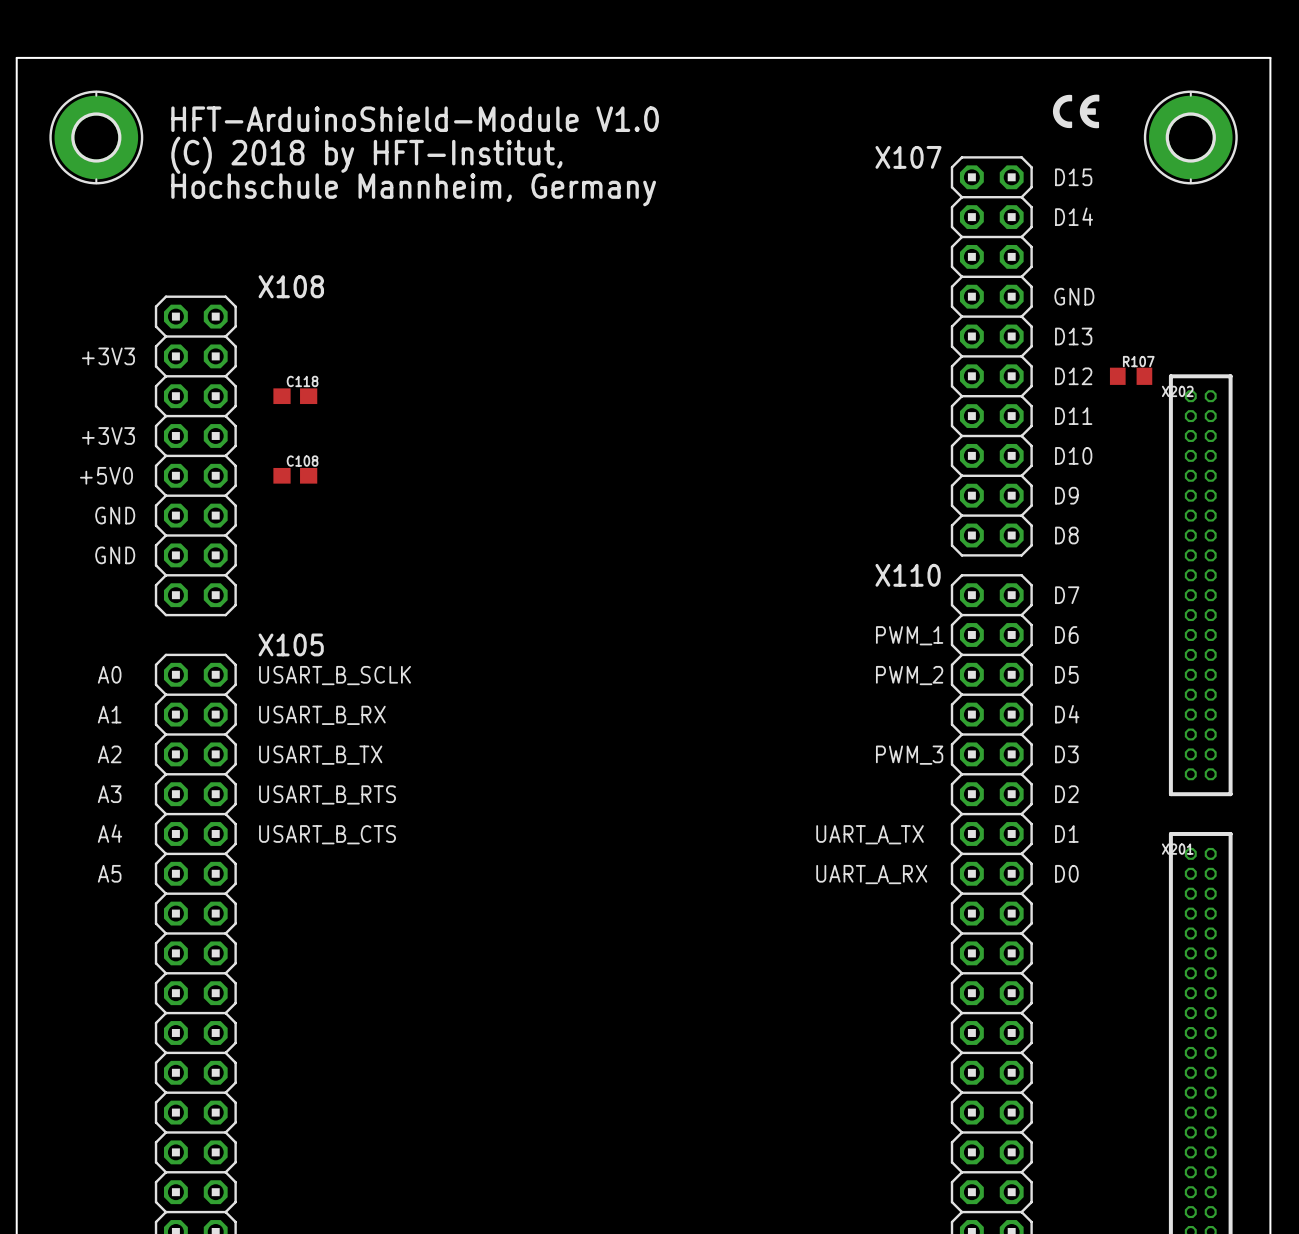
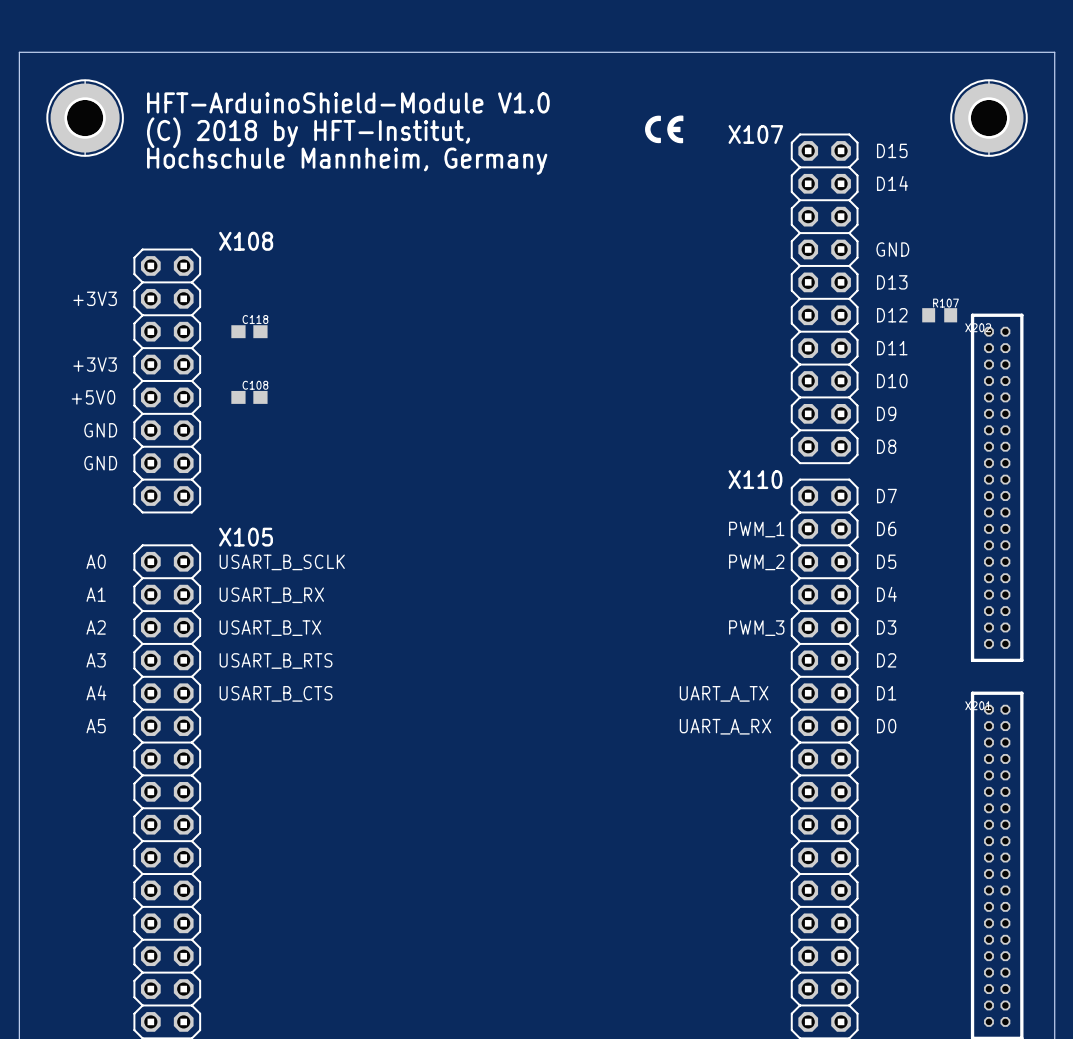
drawing position: (1062, 111) -> (652, 129)
drawing position: (1089, 111) -> (675, 129)

